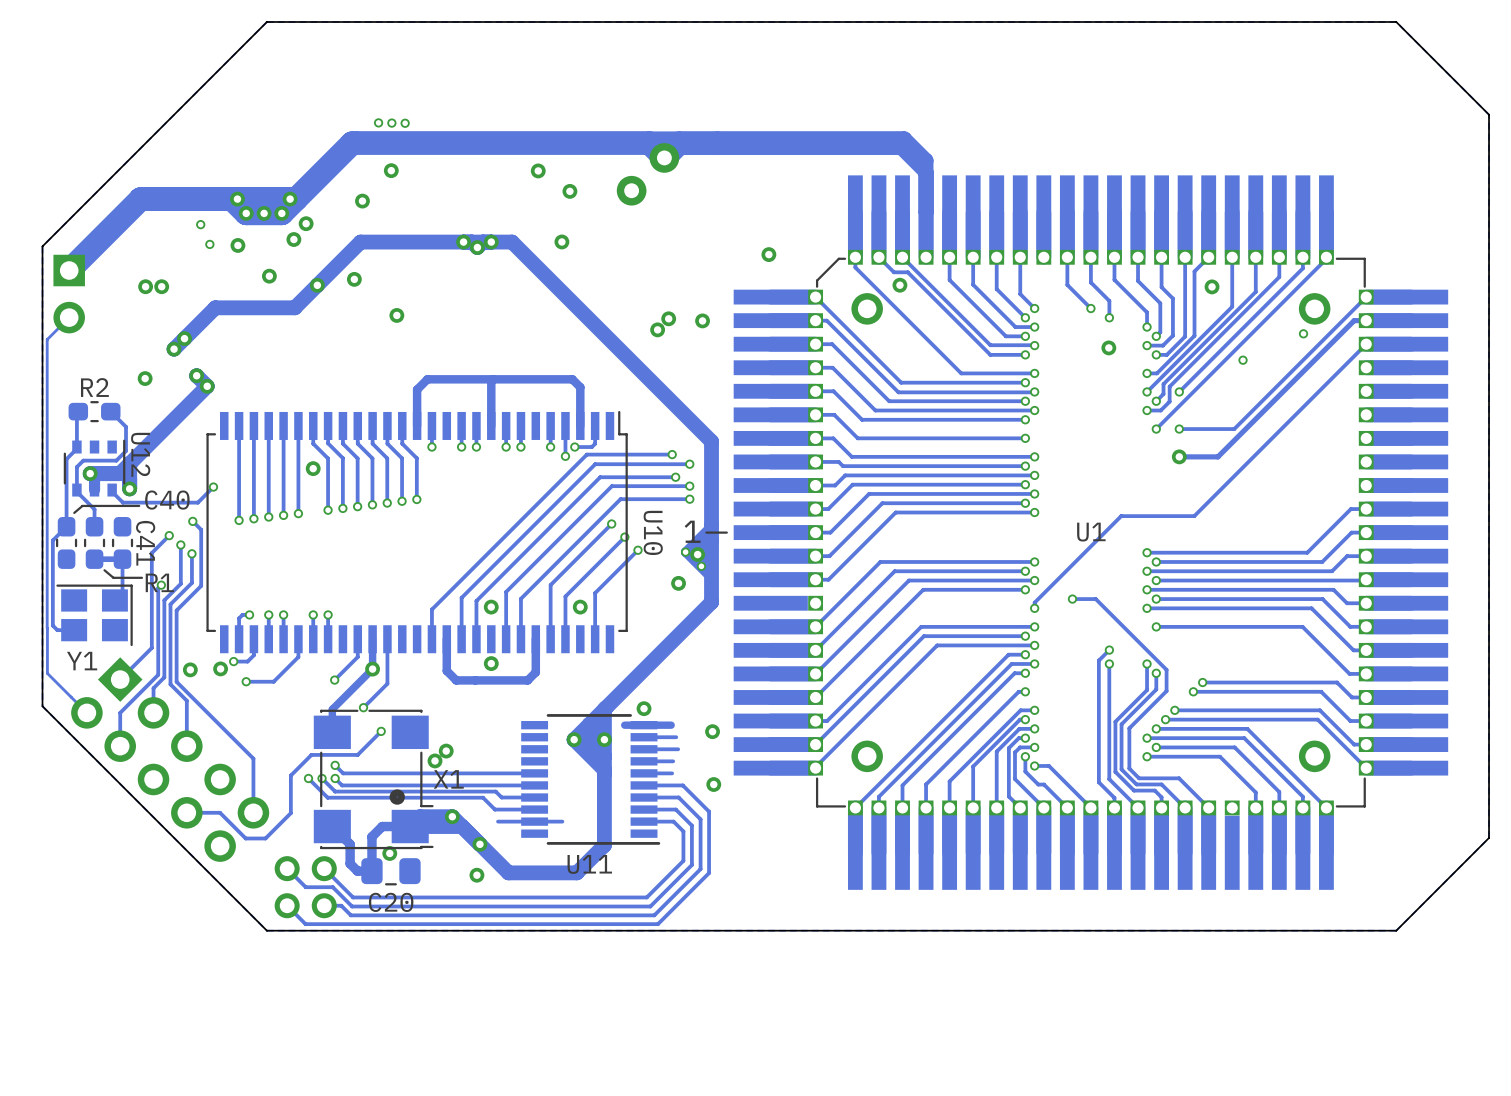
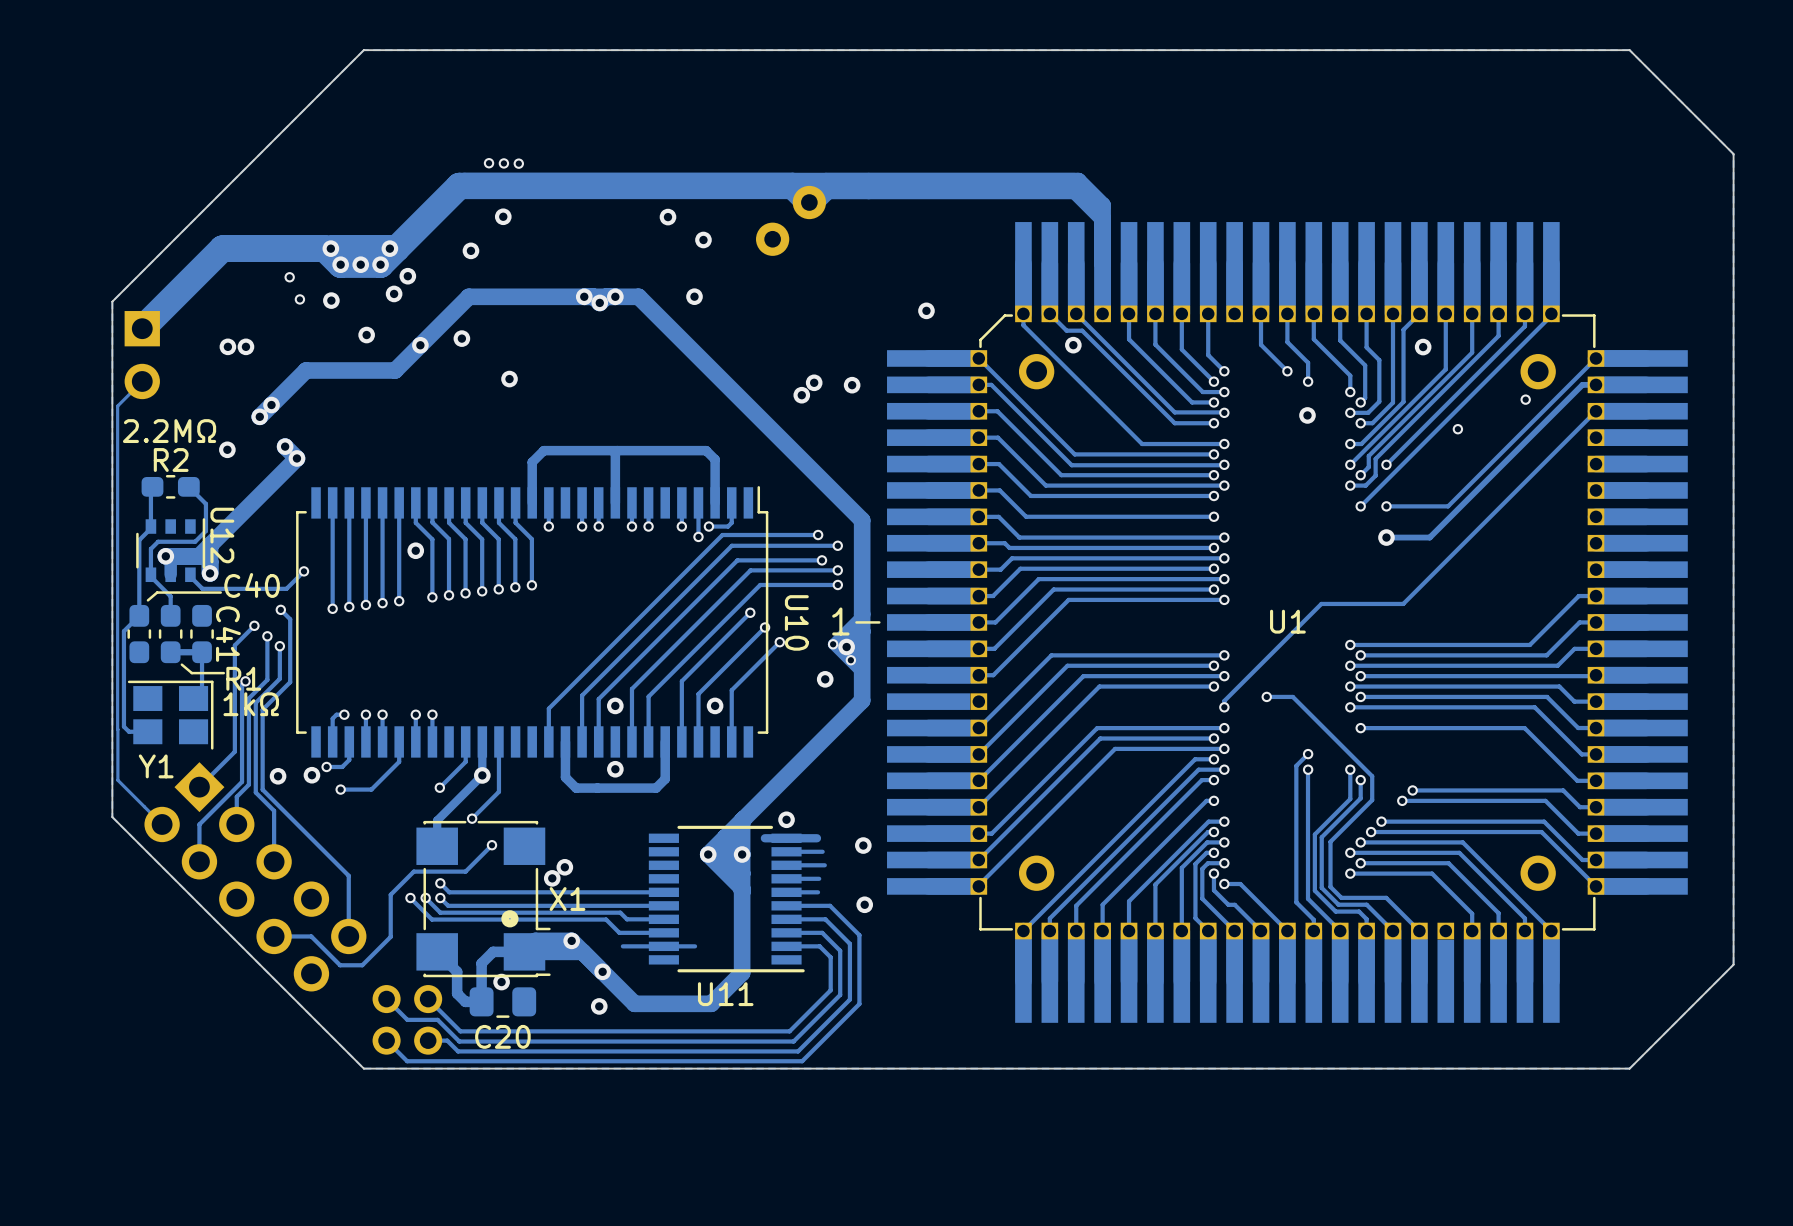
text: none -> 2.2MΩ (169, 431)
text: none -> 1kΩ (251, 704)

